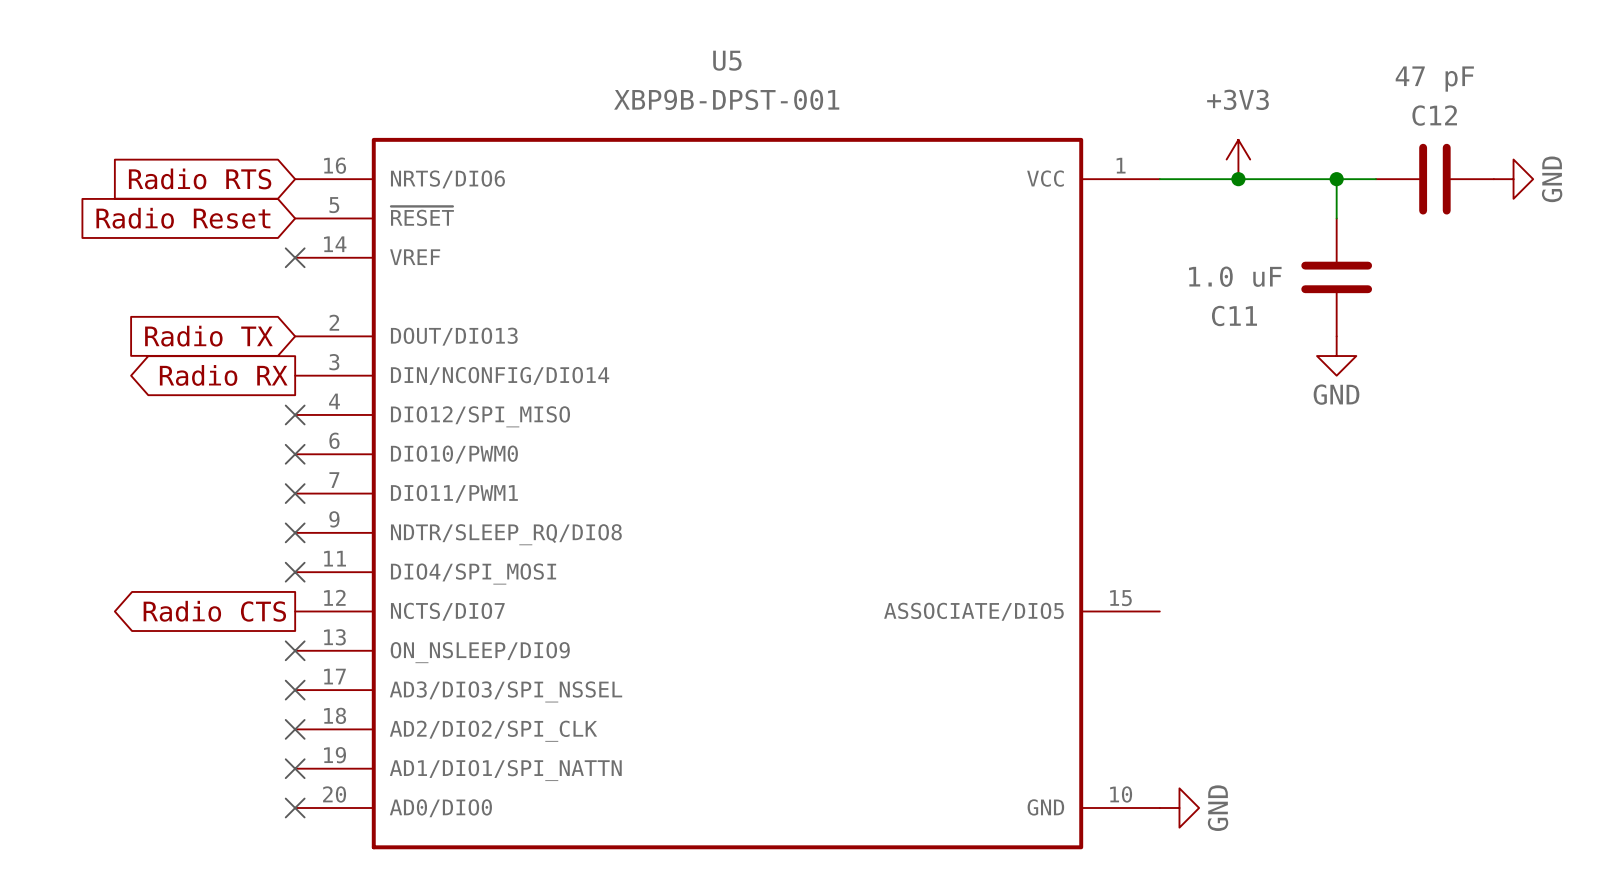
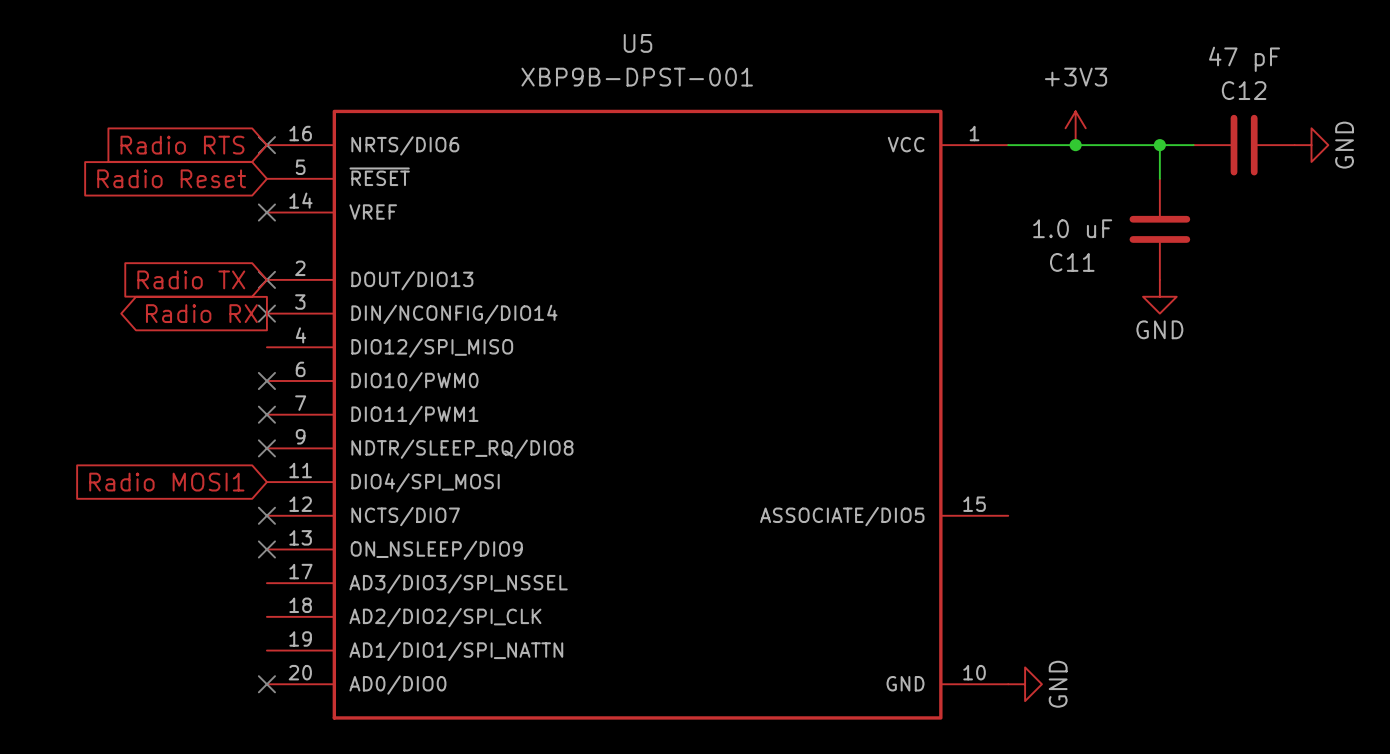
no-connect mark: none -> (266, 145)
no-connect mark: none -> (266, 279)
no-connect mark: none -> (266, 313)
no-connect mark: (295, 414) -> none
no-connect mark: (295, 572) -> none
global label shape: output (214, 611) -> input (166, 482)
global label: Radio CTS (214, 611) -> Radio MOSI1 (166, 482)
no-connect mark: none -> (266, 515)
no-connect mark: (295, 690) -> none
no-connect mark: (295, 729) -> none
no-connect mark: (295, 768) -> none

